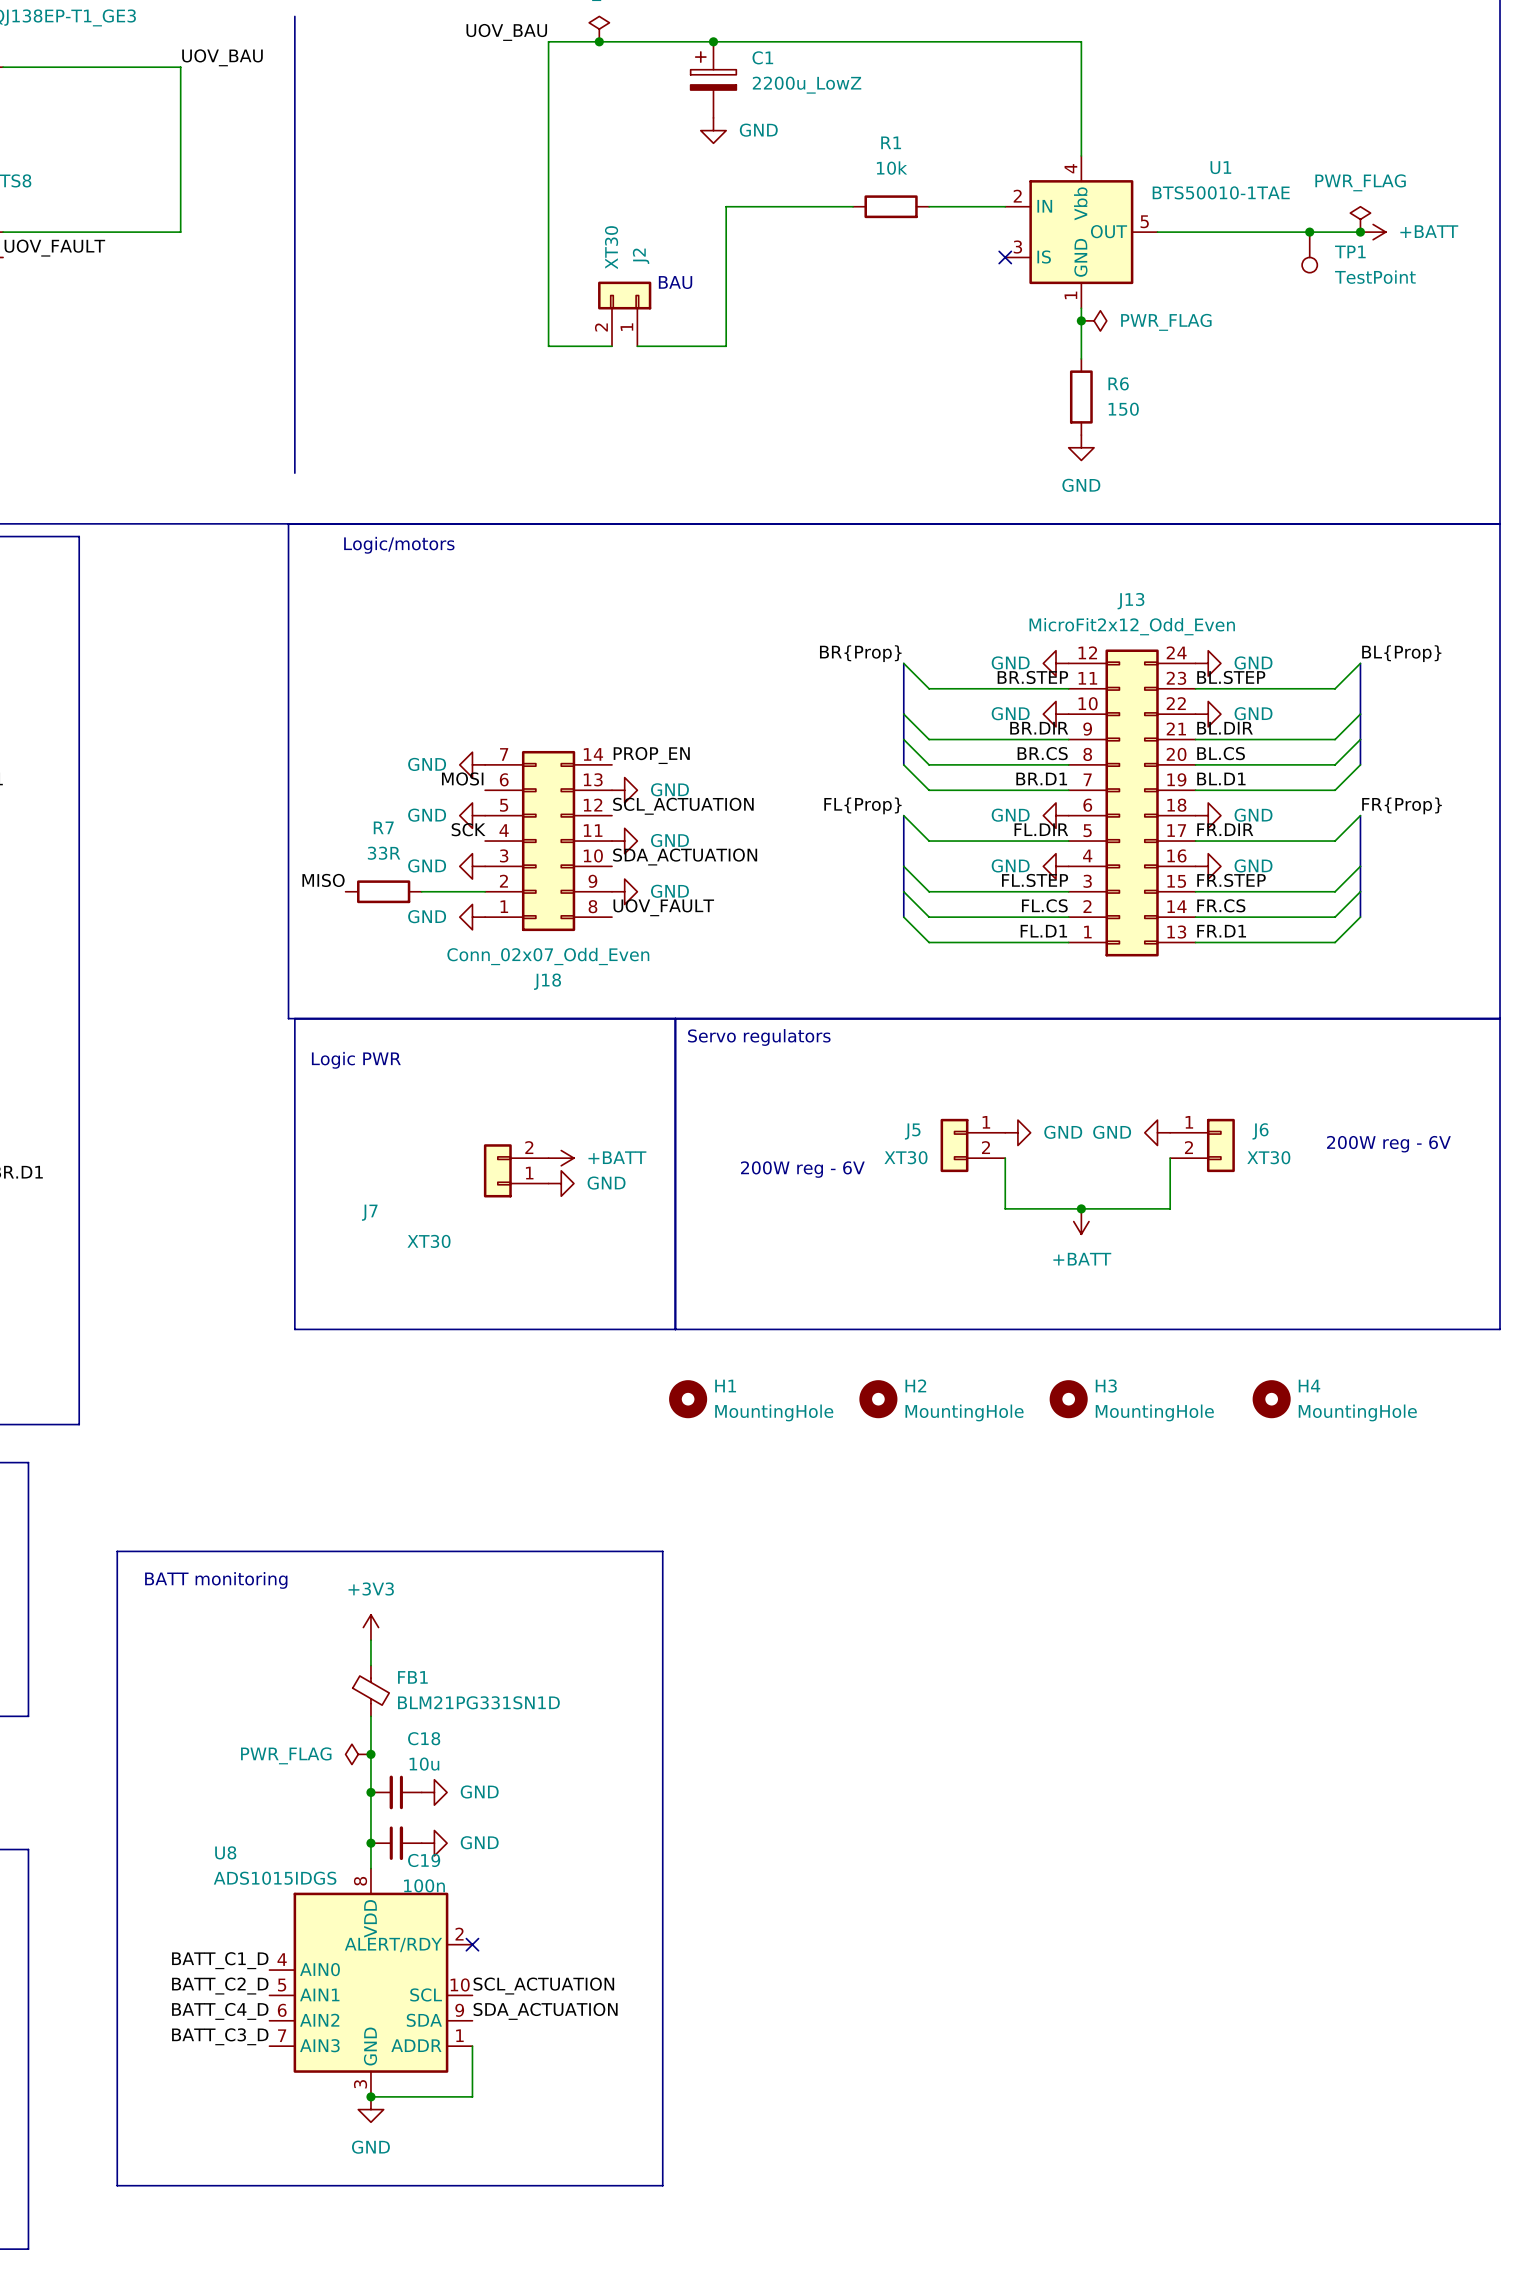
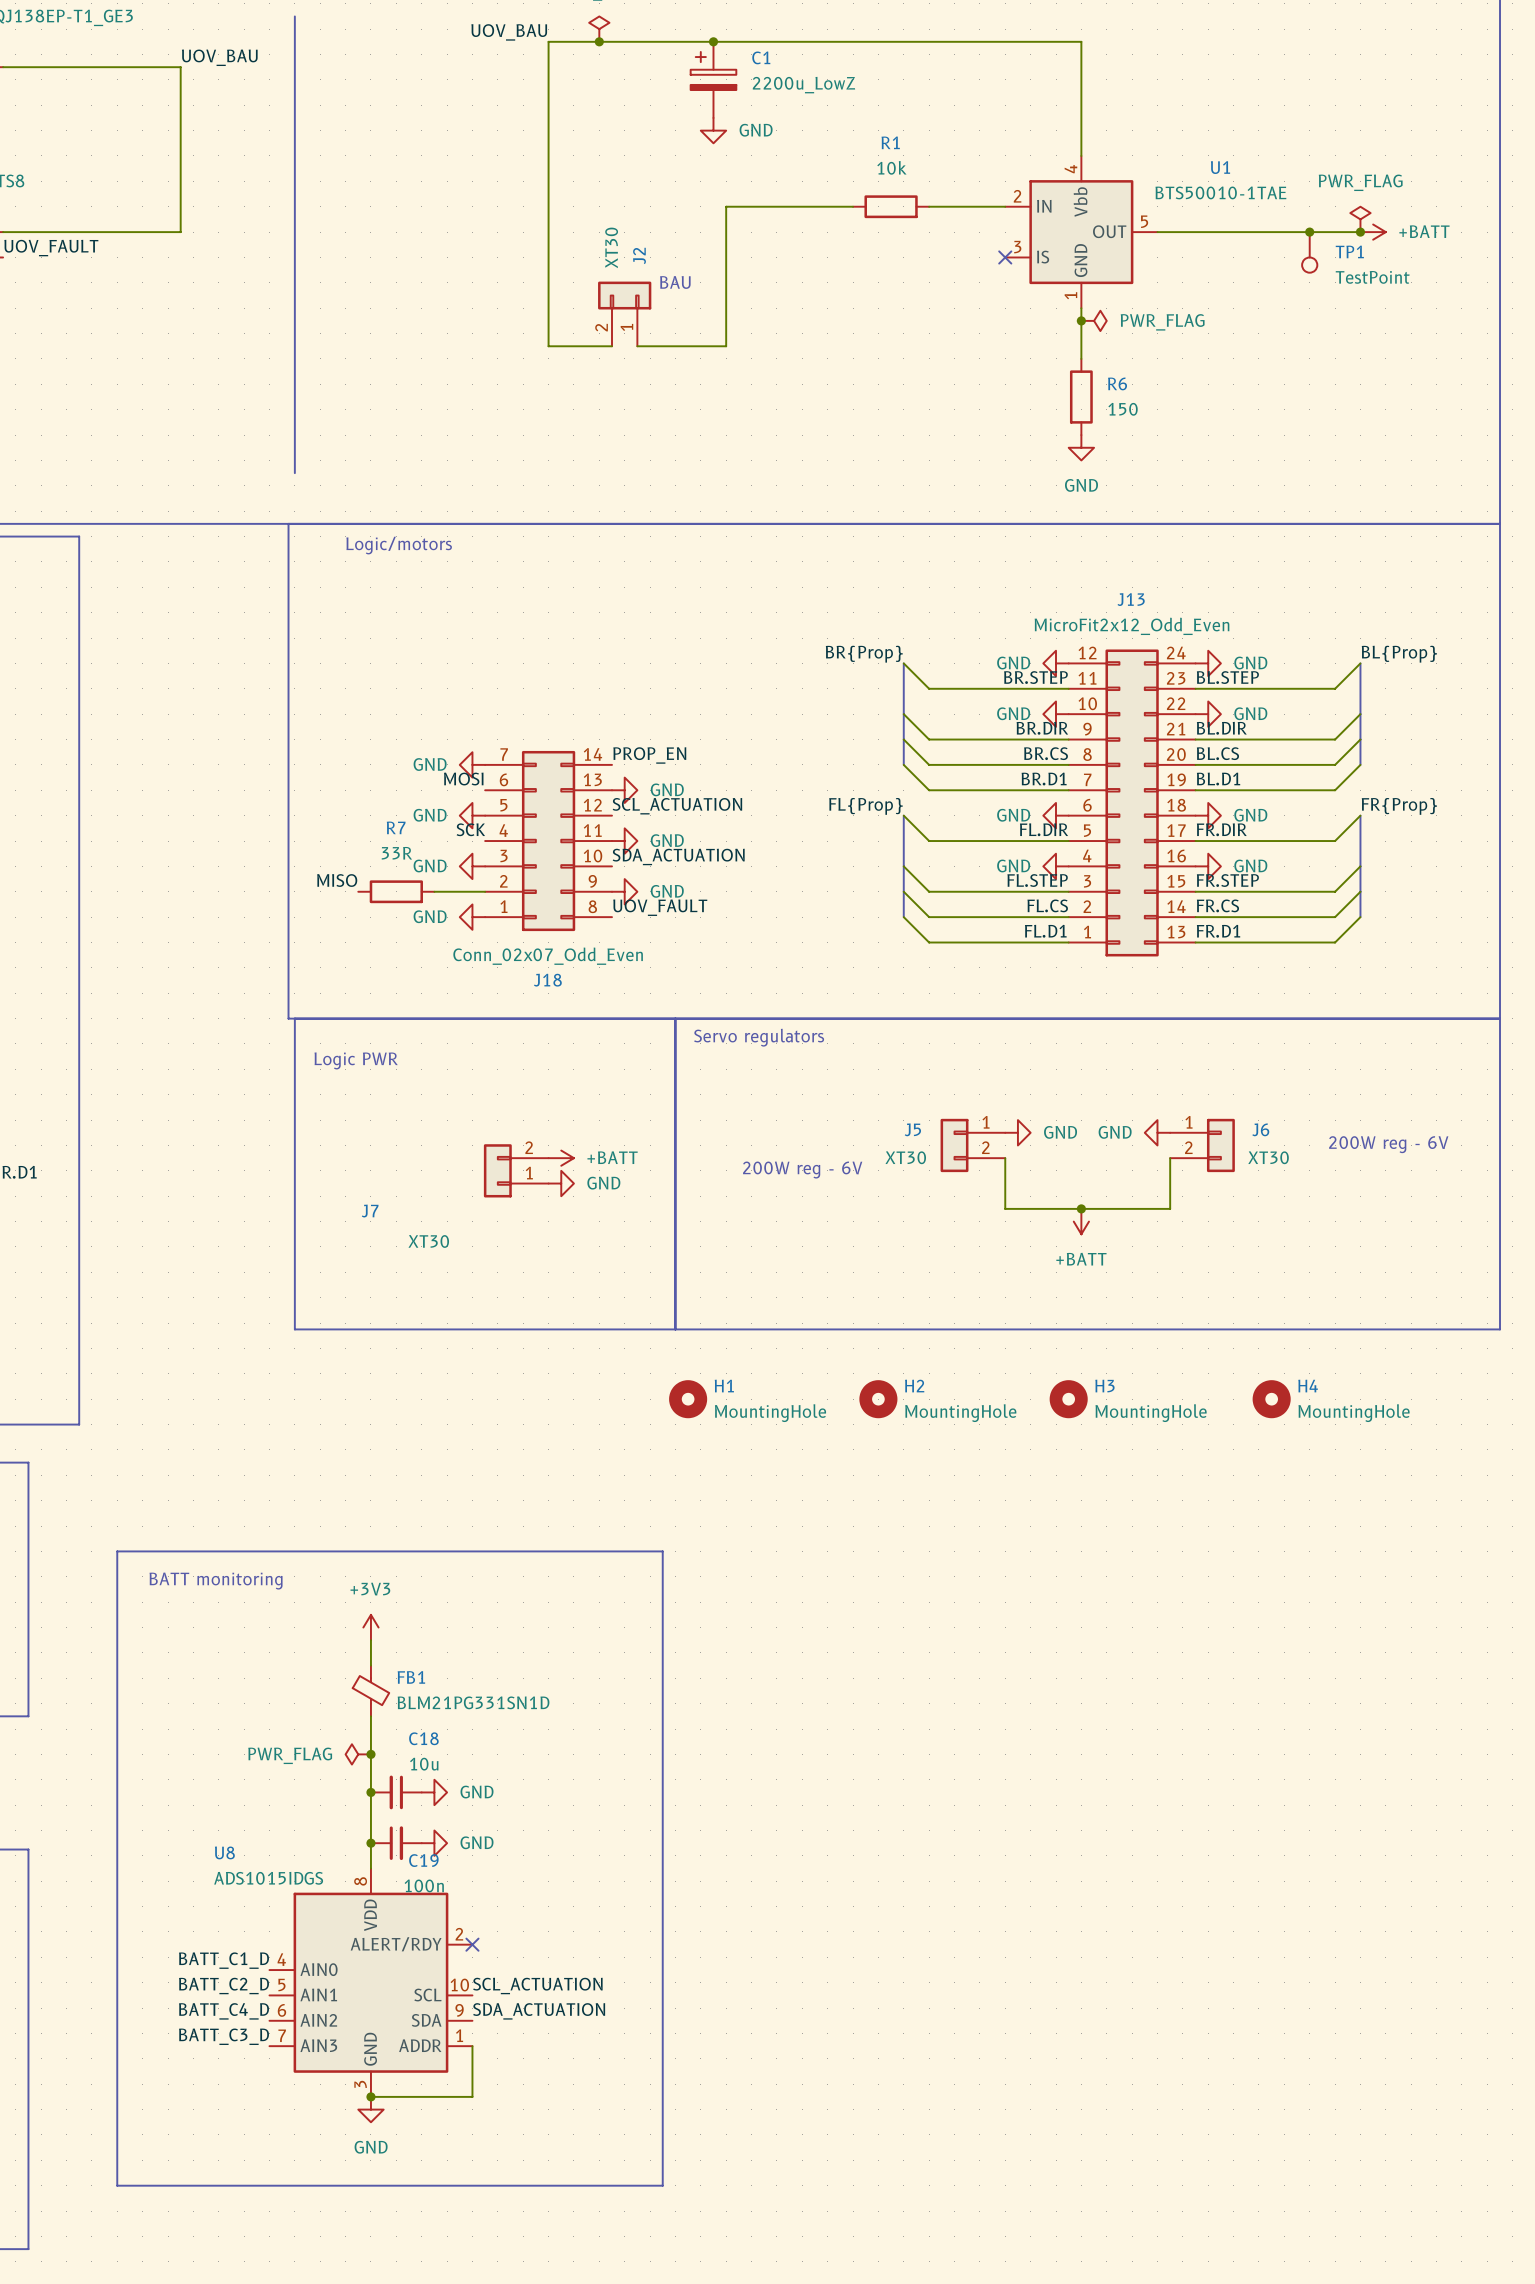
label position: MISO (323, 880) -> MISO (337, 880)
R7 position: (383, 891) -> (396, 891)

